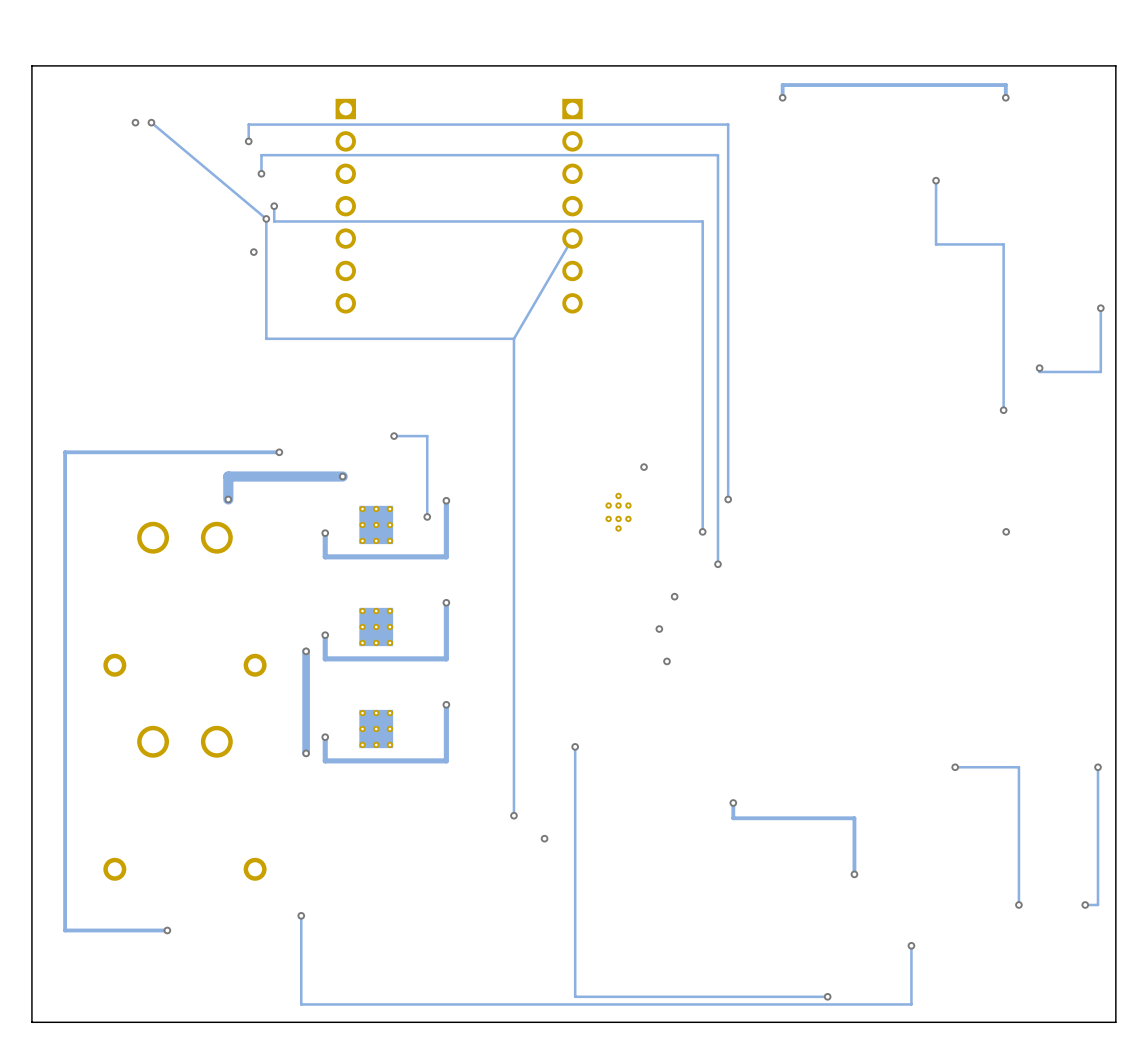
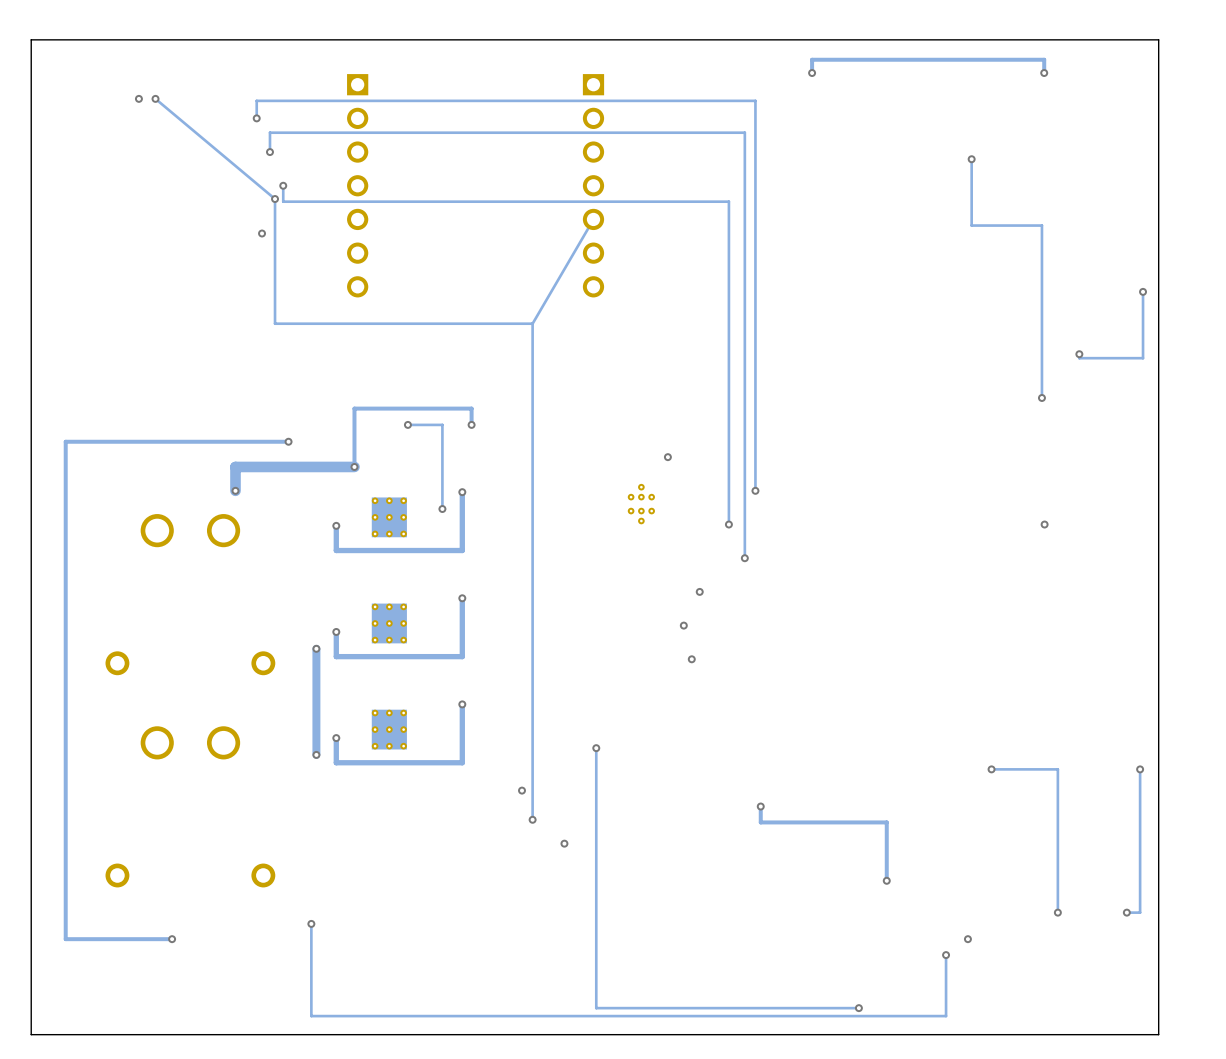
track: none -> (471, 424) (471, 408) (354, 408) (354, 466)
via: none -> (471, 424)
via: none -> (522, 790)
via: none -> (967, 939)

